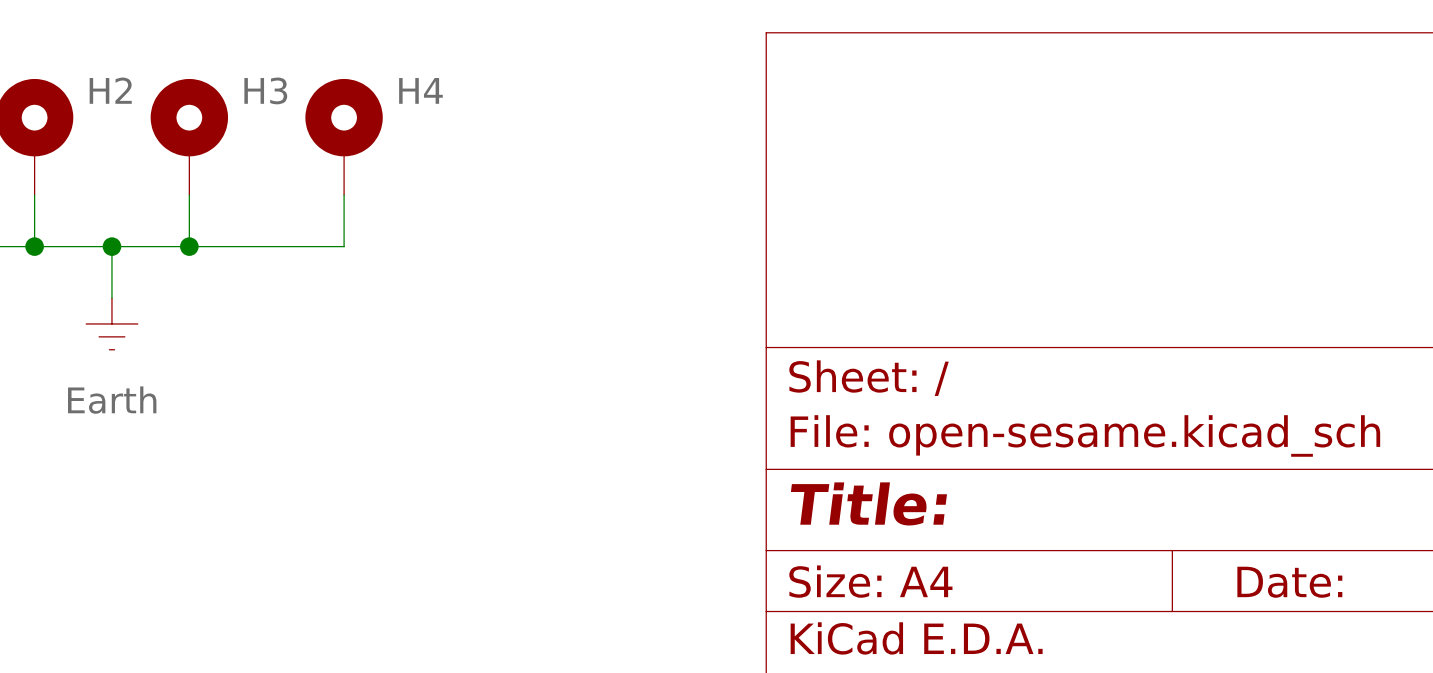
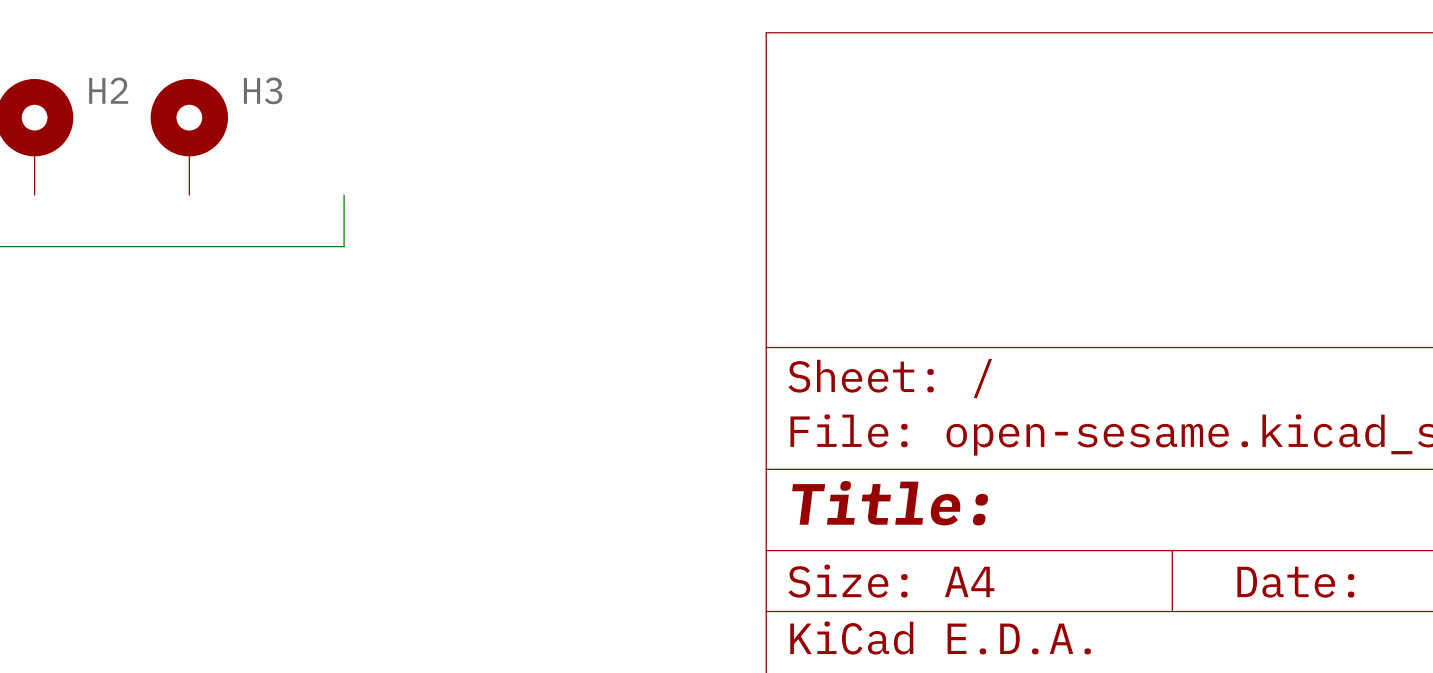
H4: (344, 137) -> none
wire: (34, 195) (34, 246) -> none
wire: (189, 195) (189, 246) -> none
junction: (34, 246) -> none
wire: (111, 246) (111, 298) -> none
junction: (111, 246) -> none
junction: (189, 246) -> none
power symbol: Earth (111, 323) -> none

